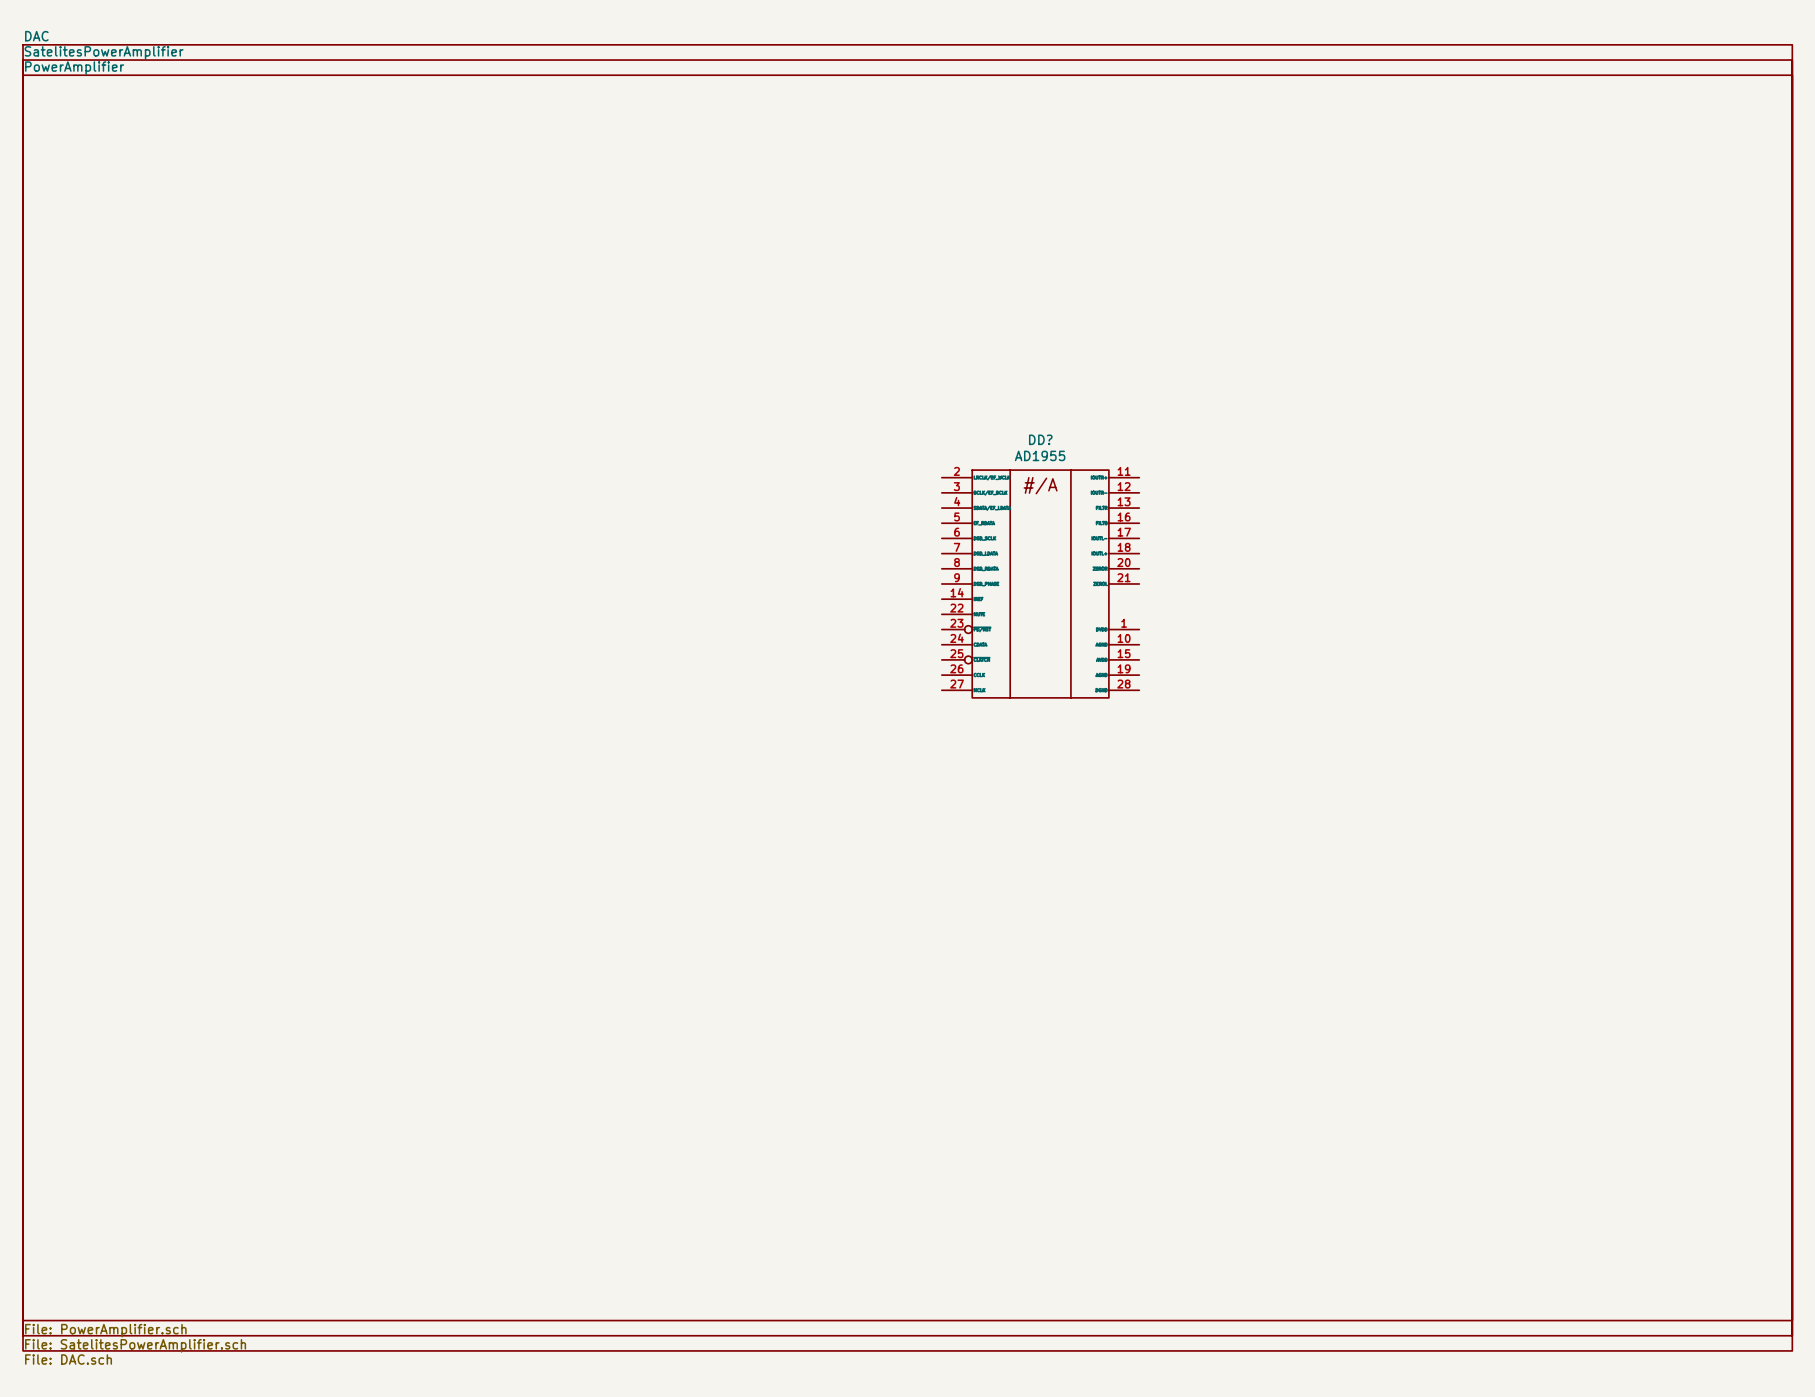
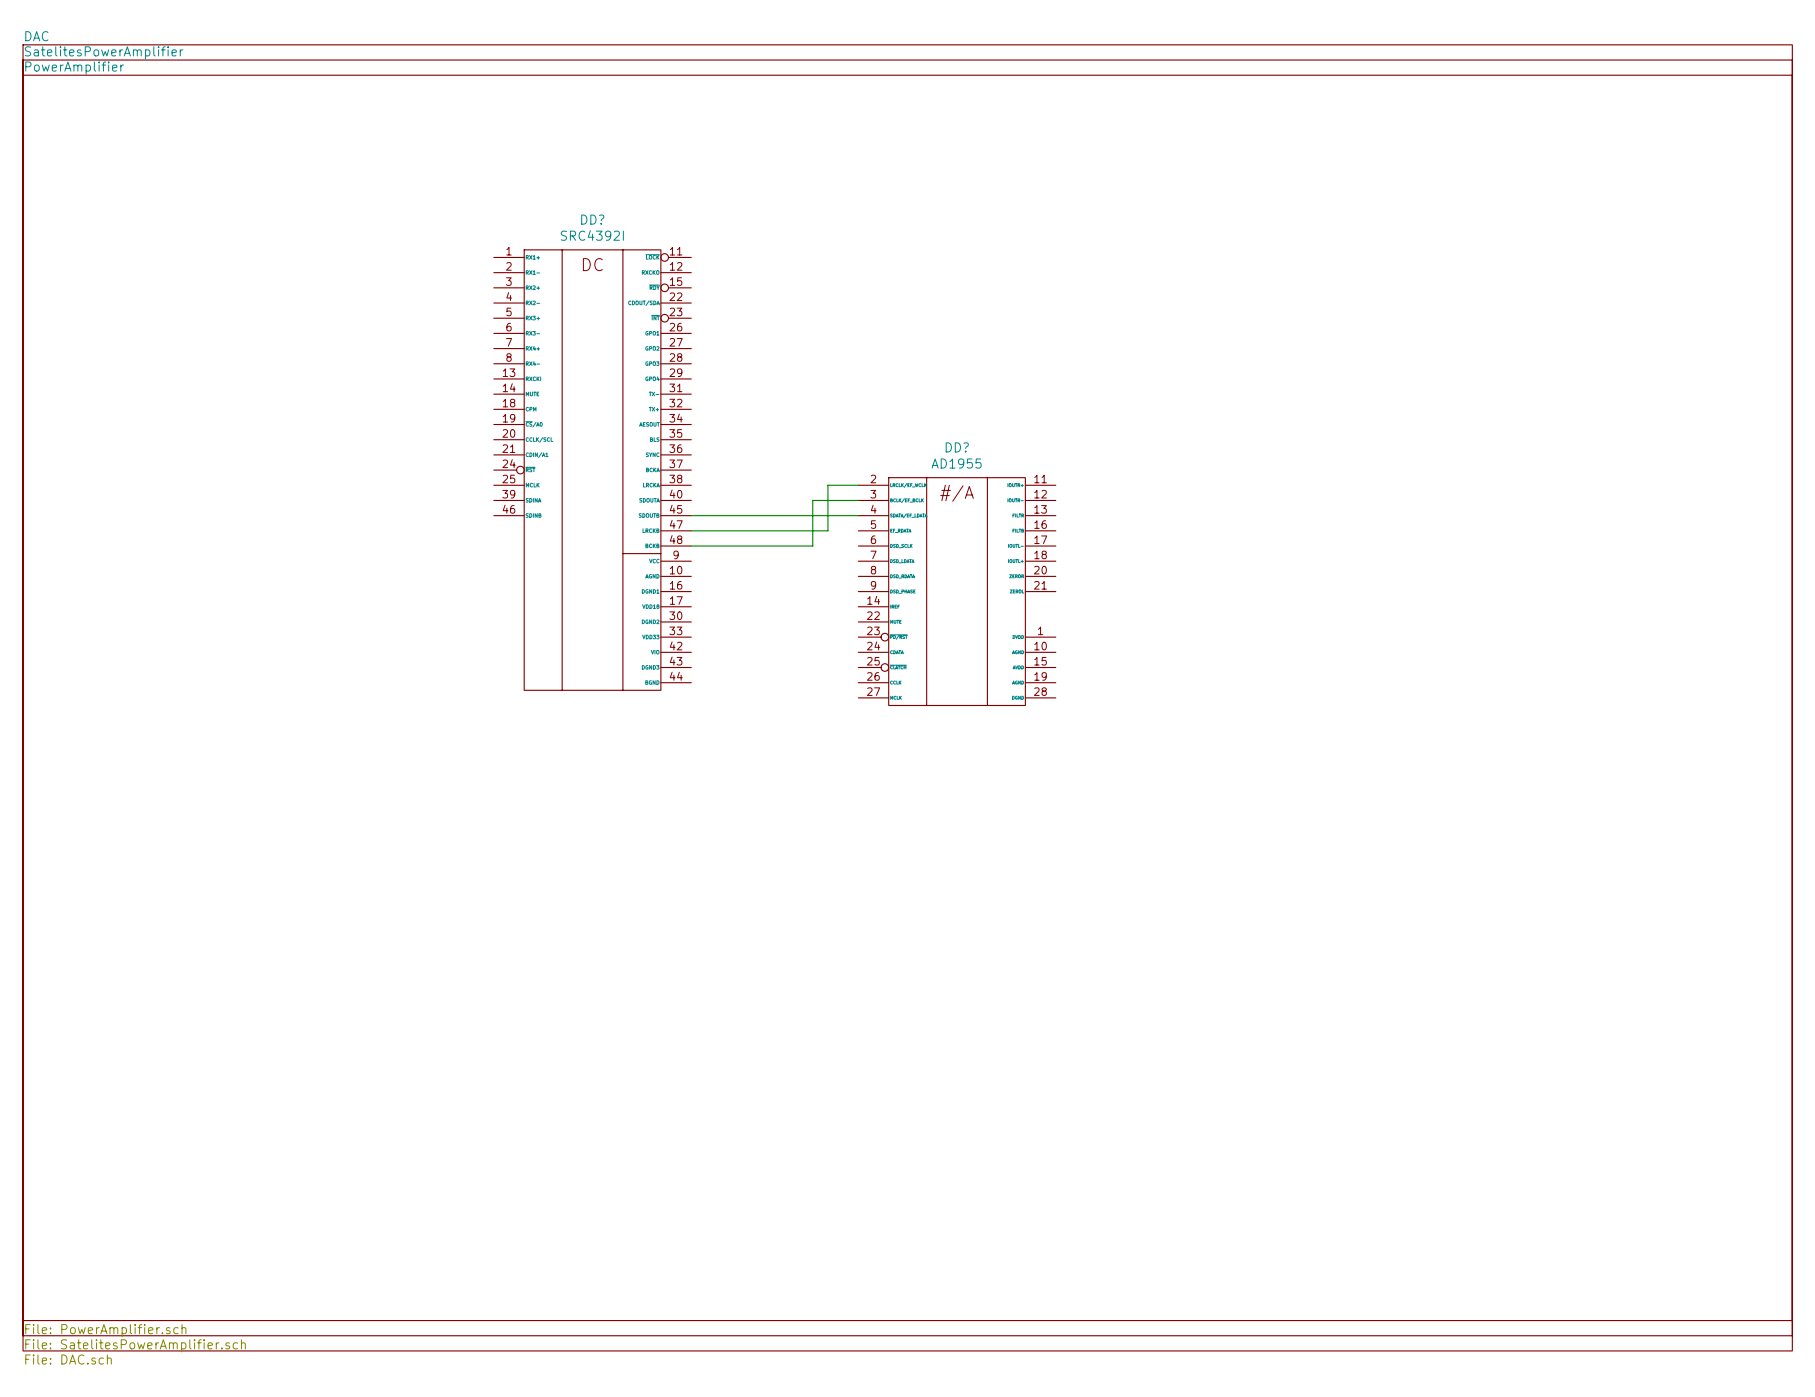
DD?: none -> SRC4392I (592, 470)
wire: none -> (858, 485) (827, 485) (827, 530) (691, 530)
wire: none -> (858, 500) (812, 500) (812, 546) (691, 546)
wire: none -> (691, 515) (858, 515)
DD? position: (1040, 583) -> (957, 591)

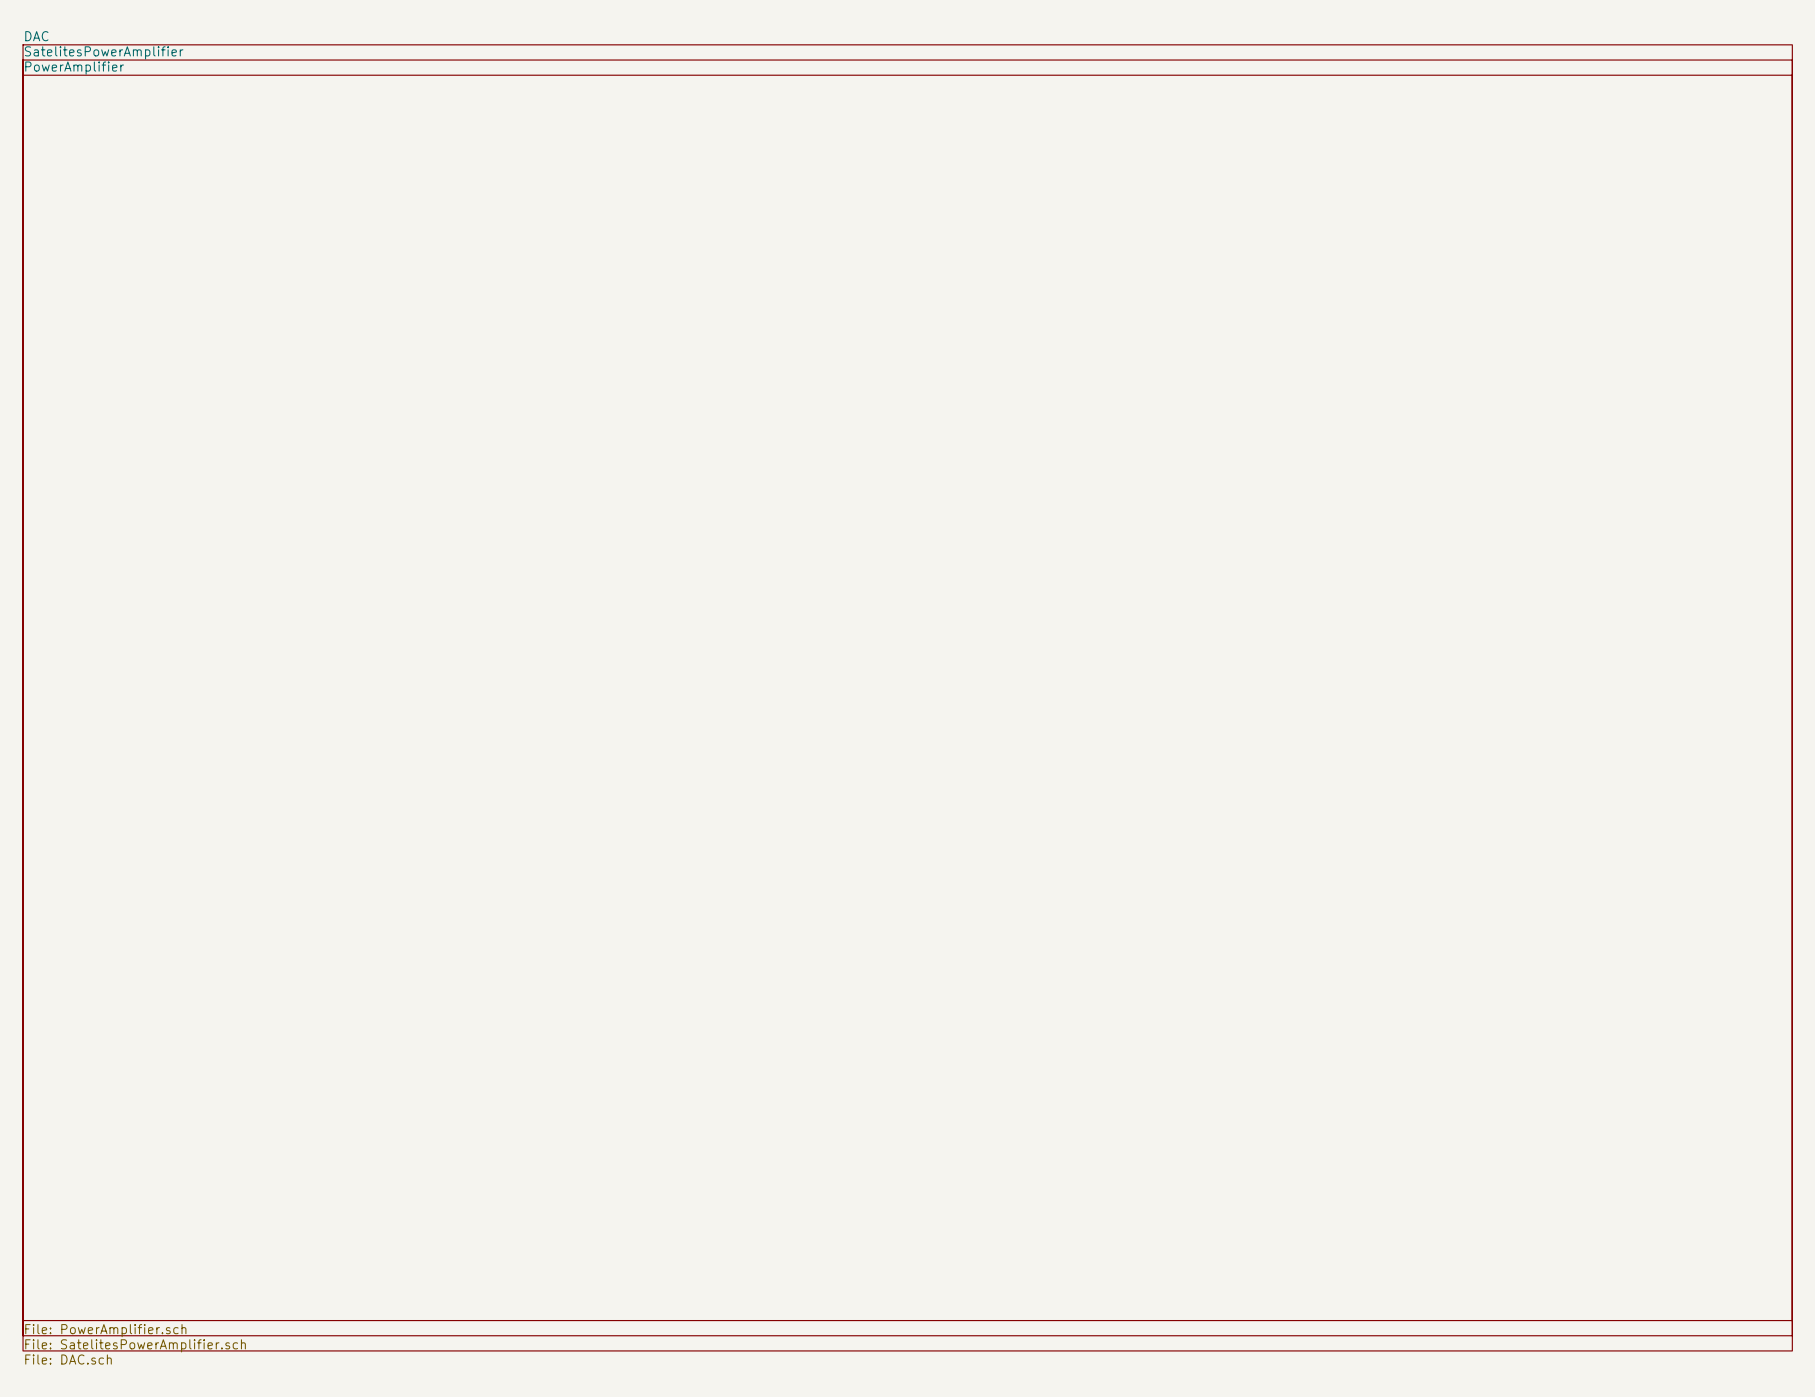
DD?: SRC4392I (592, 470) -> none
wire: (858, 485) (827, 485) (827, 530) (691, 530) -> none
wire: (858, 500) (812, 500) (812, 546) (691, 546) -> none
wire: (691, 515) (858, 515) -> none
DD?: AD1955 (957, 591) -> none

